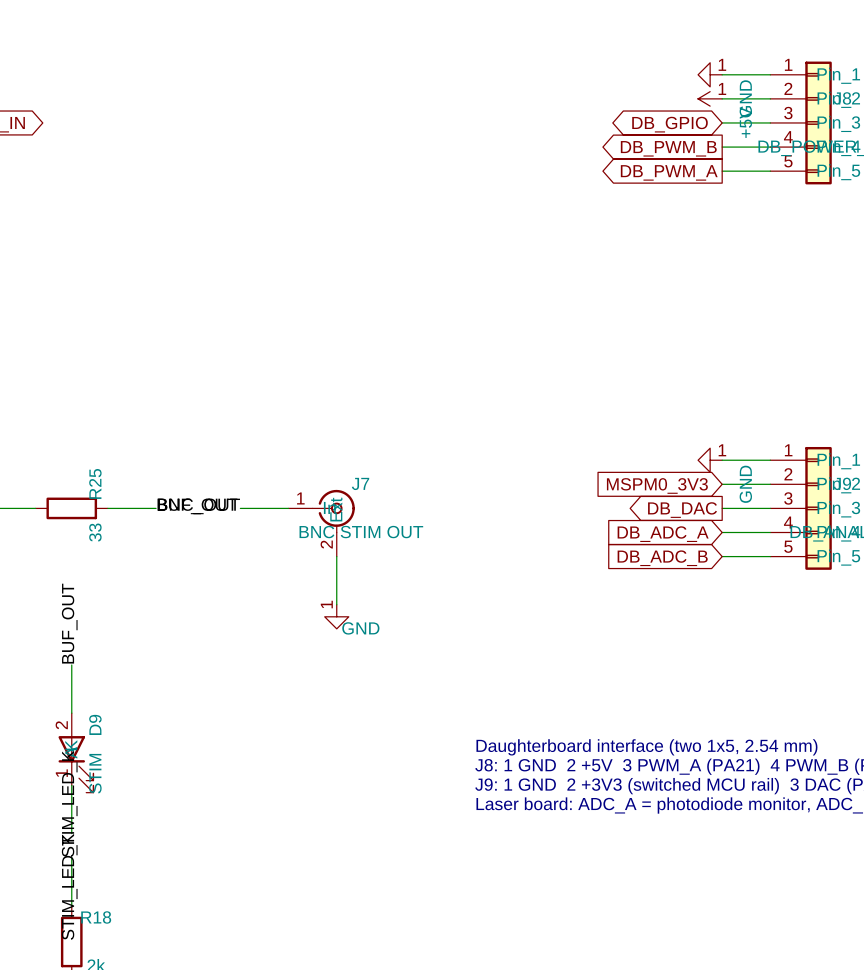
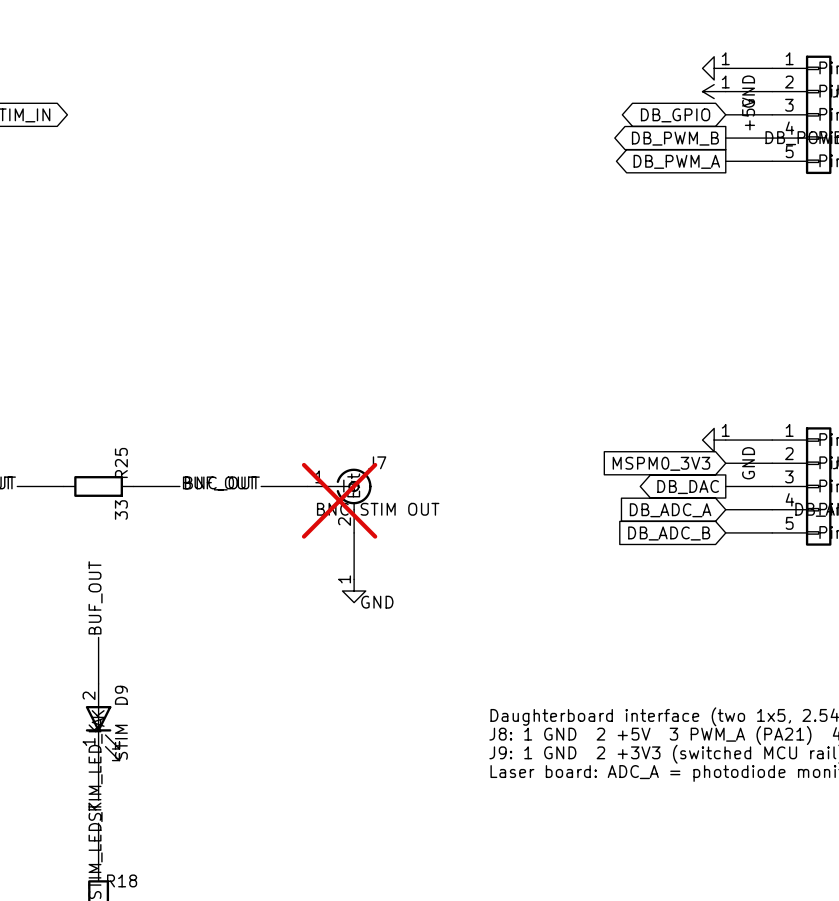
J7 do-not-place cross: none -> (339, 500)

